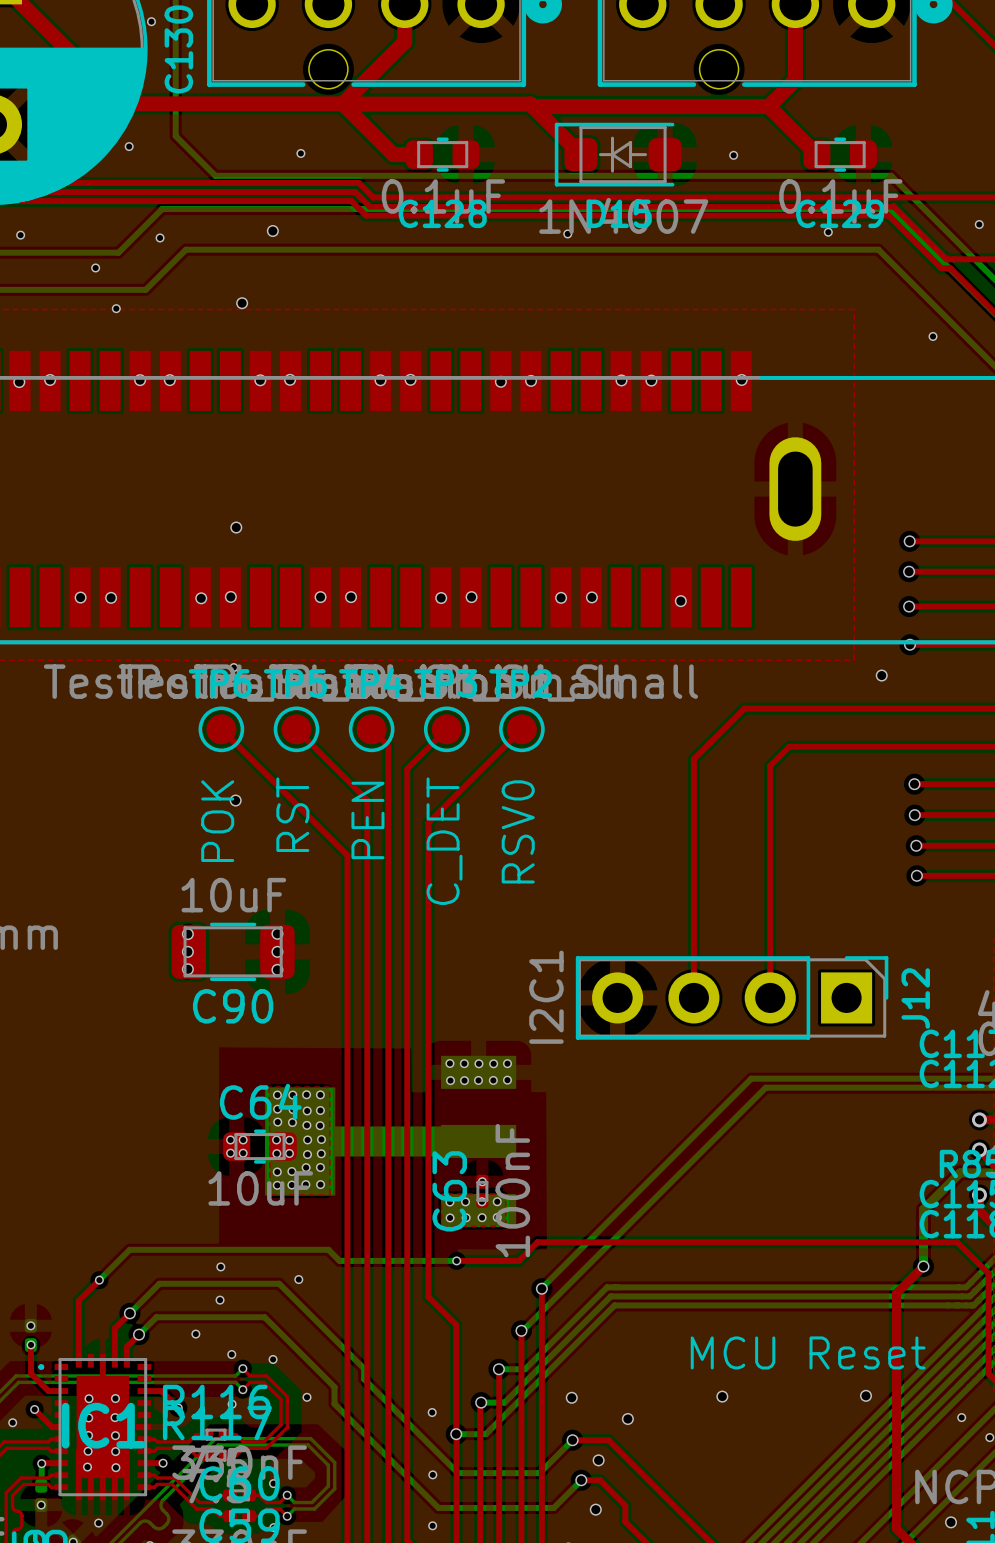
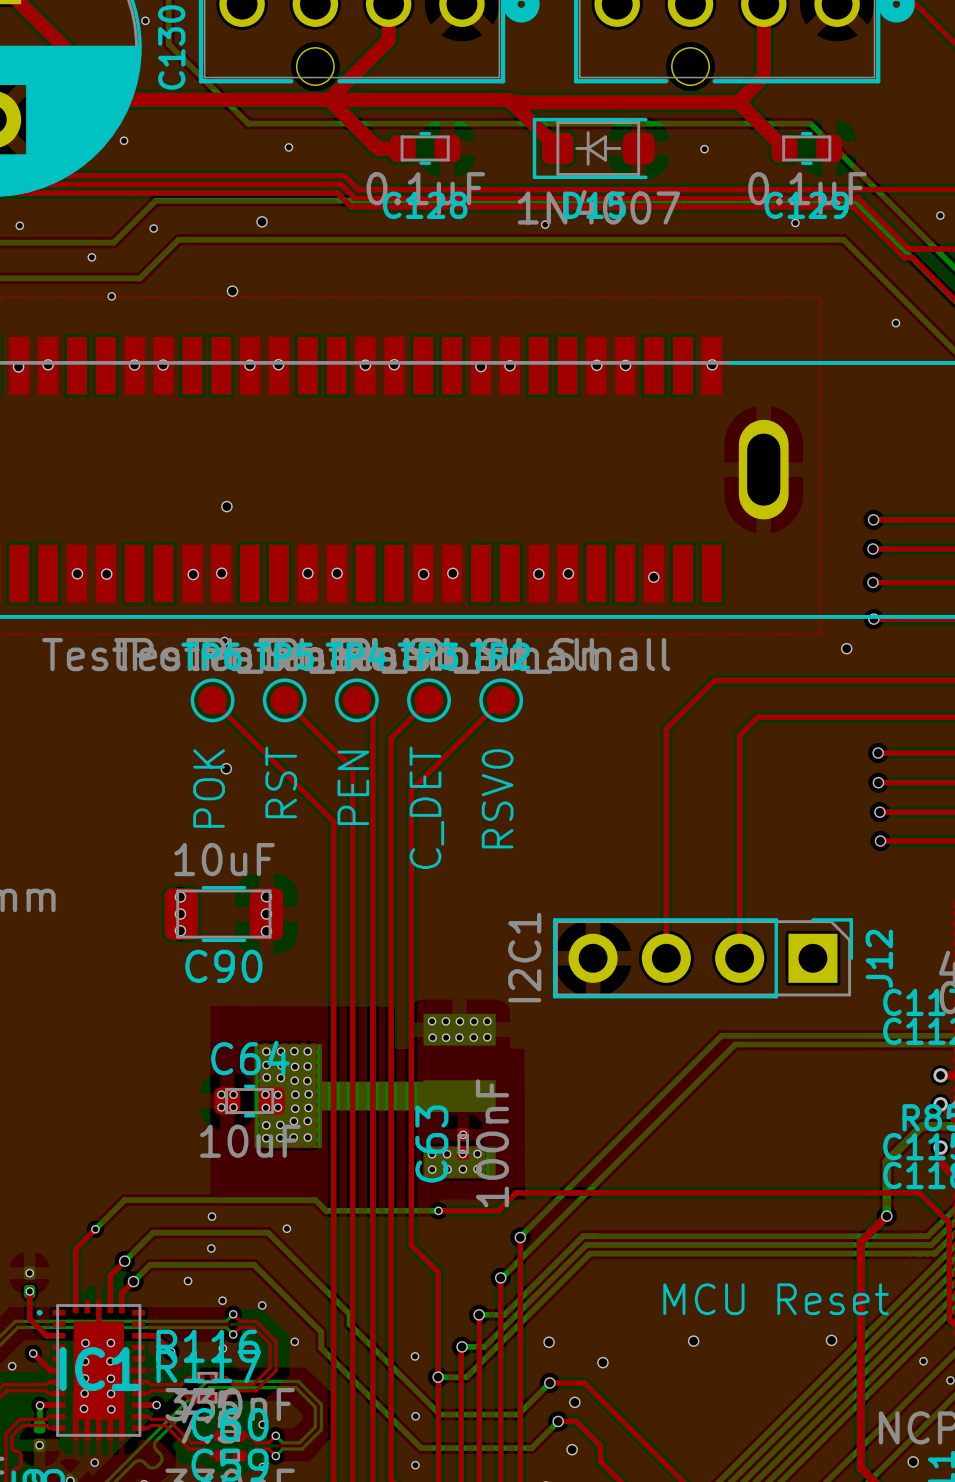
bottom track: (175, 45) (175, 136) (215, 175) (891, 175) -> (168, 44) (248, 123) (810, 123) (855, 168)

